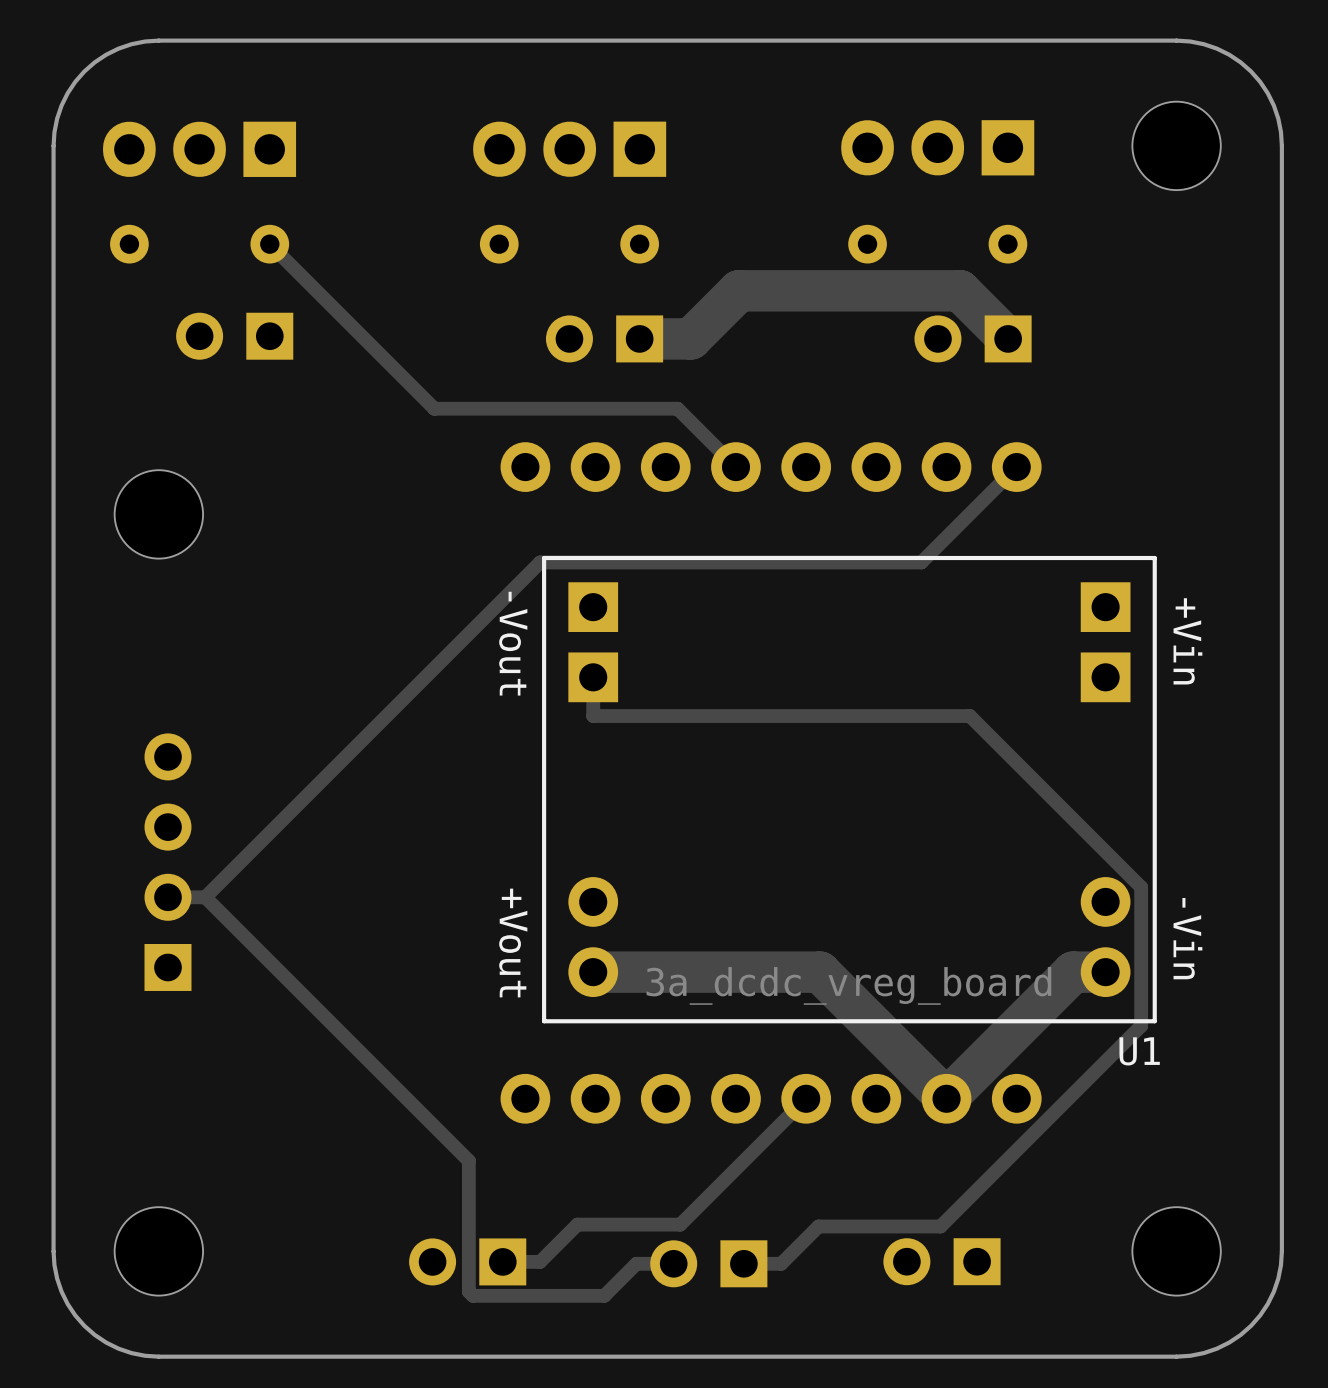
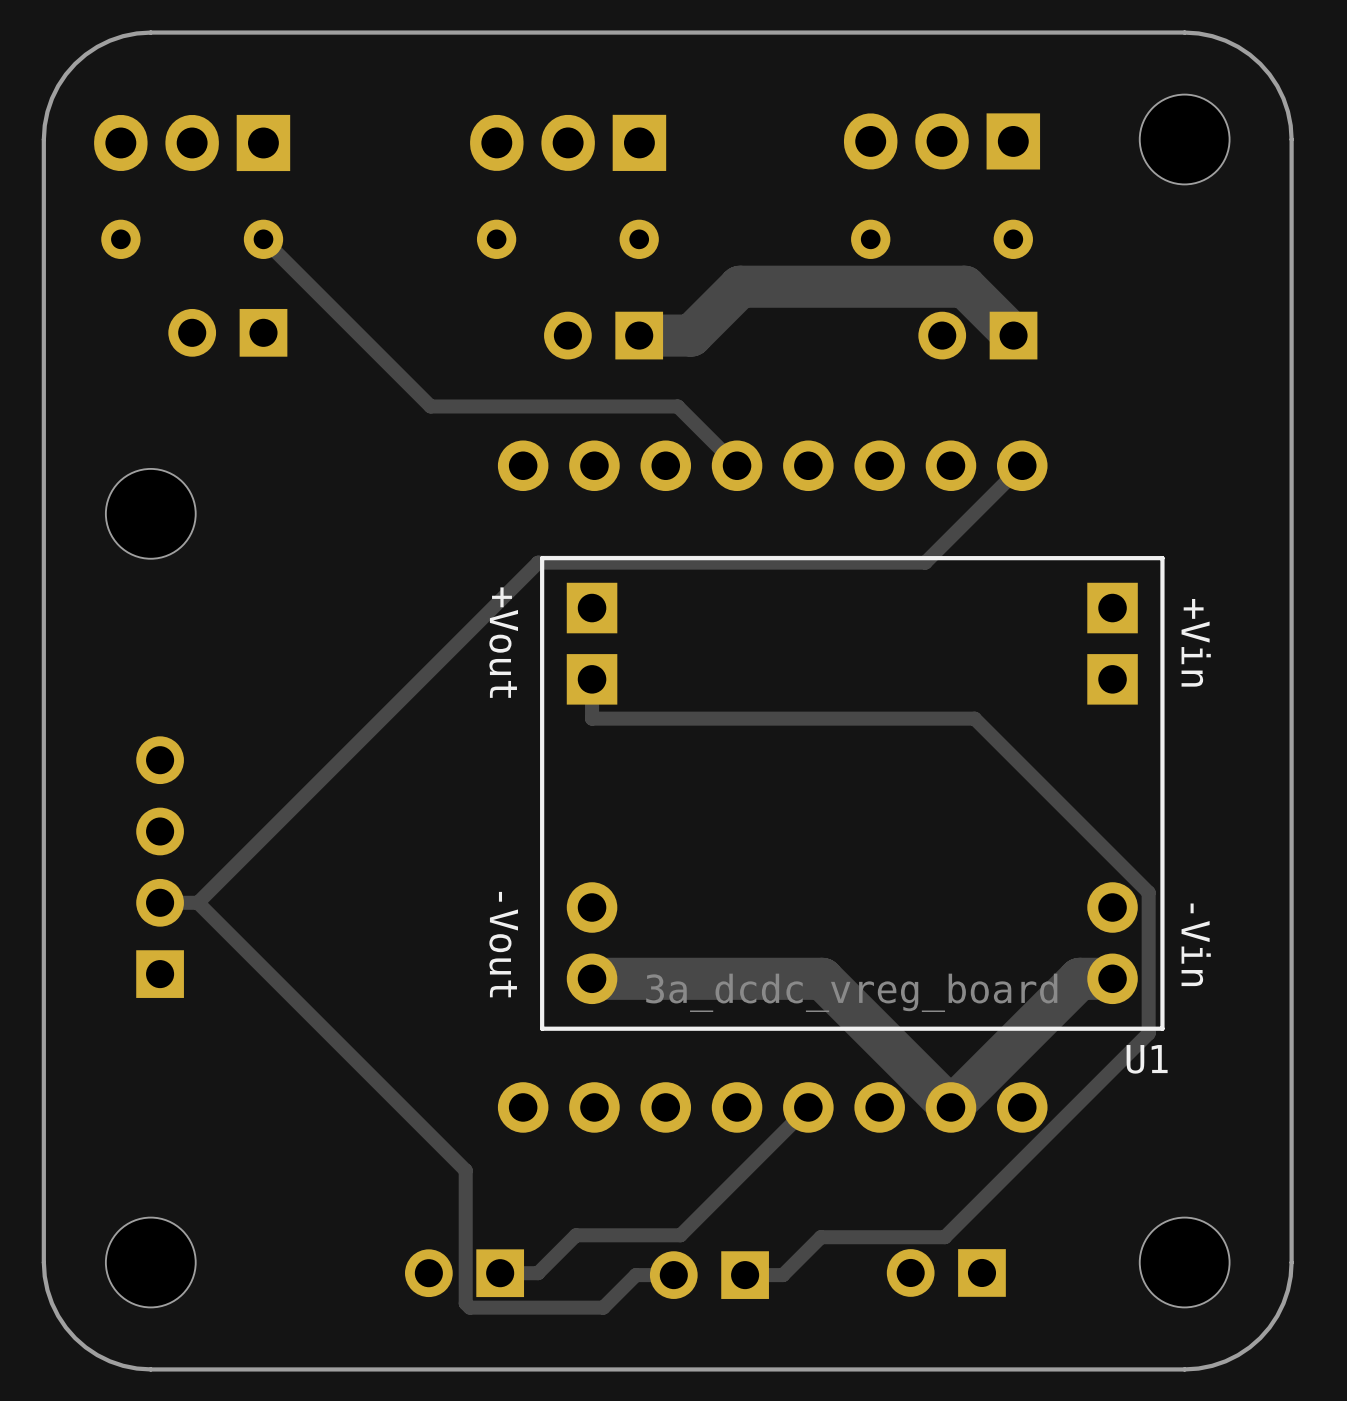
U1 text position: -Vout (513, 643) -> -Vout (503, 944)
U1 text position: +Vout (513, 943) -> +Vout (503, 642)

